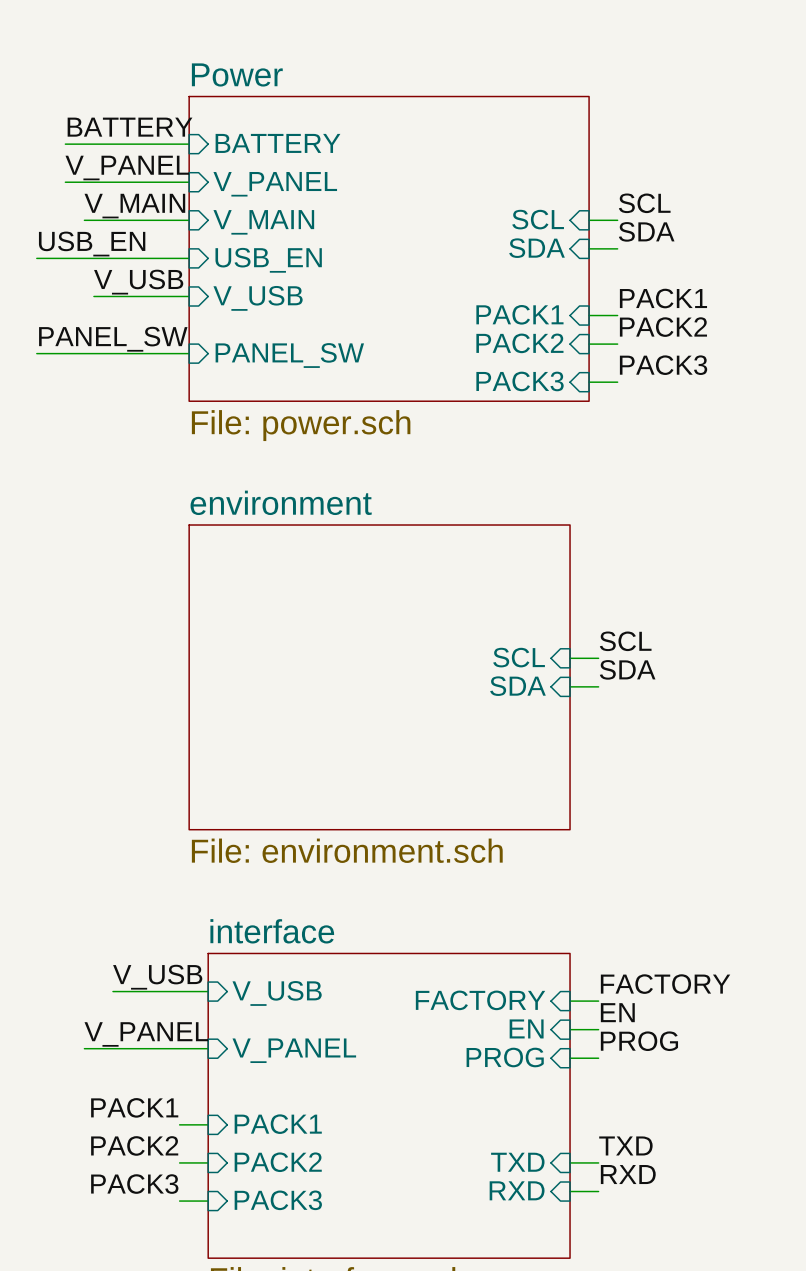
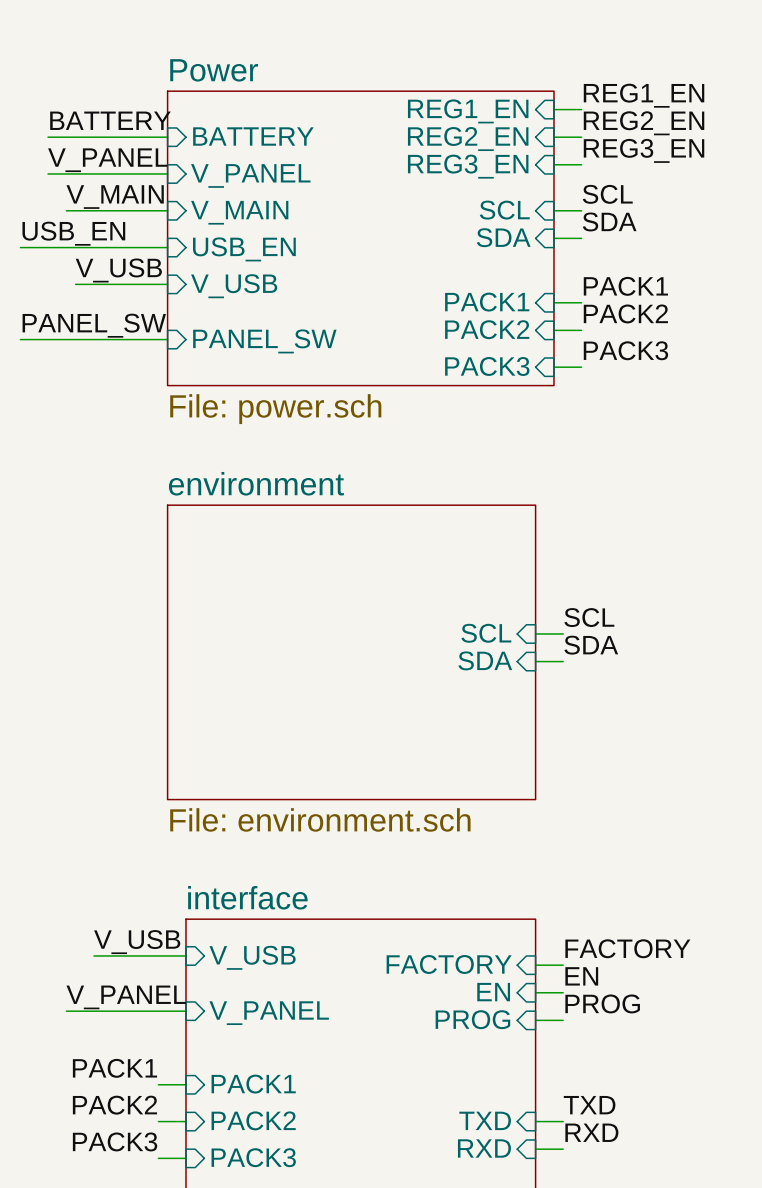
label: none -> REG1_EN (644, 95)
wire: none -> (553, 109) (581, 109)
sheet pin: none -> REG1_EN (468, 111)
label: none -> REG2_EN (644, 123)
wire: none -> (553, 137) (581, 137)
sheet pin: none -> REG2_EN (468, 139)
label: none -> REG3_EN (644, 150)
wire: none -> (553, 164) (581, 164)
sheet pin: none -> REG3_EN (468, 166)

